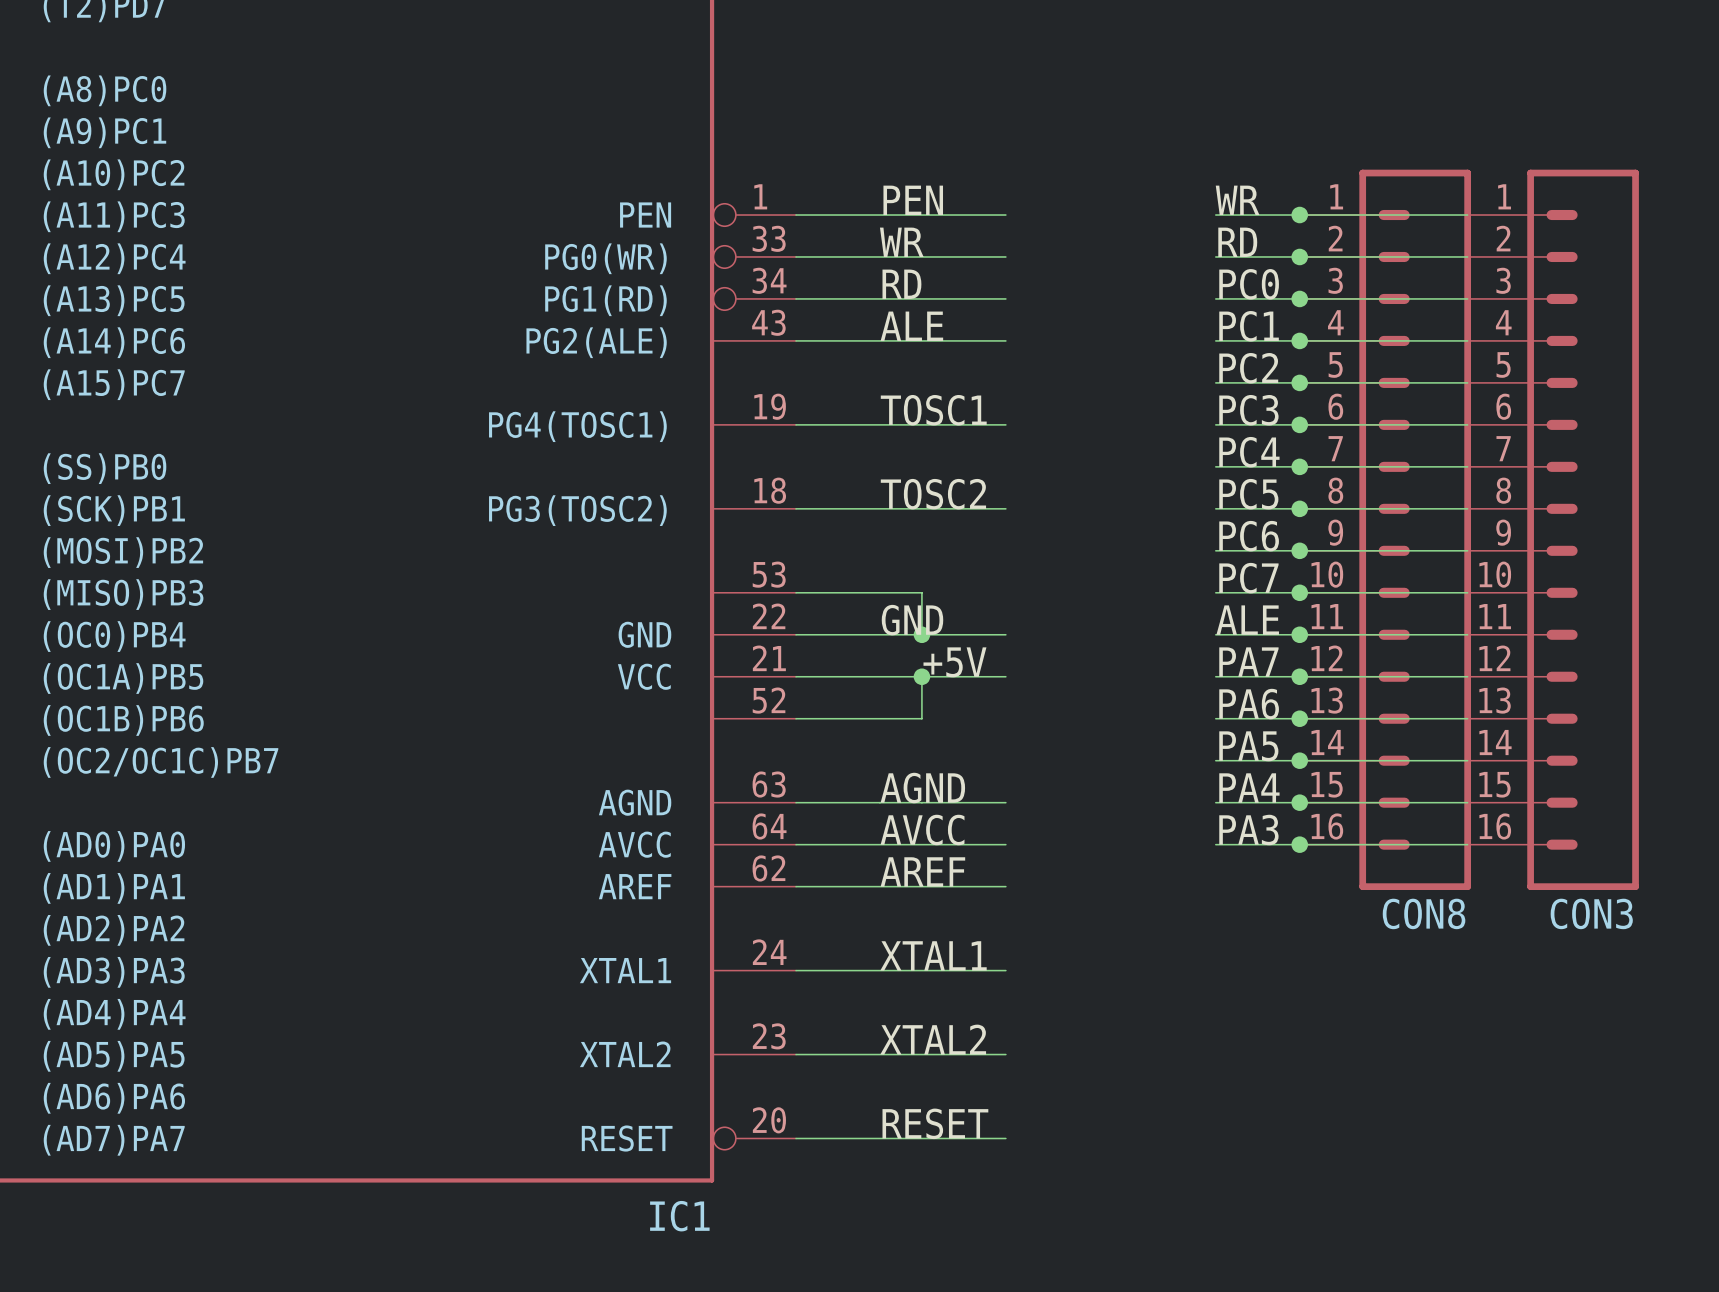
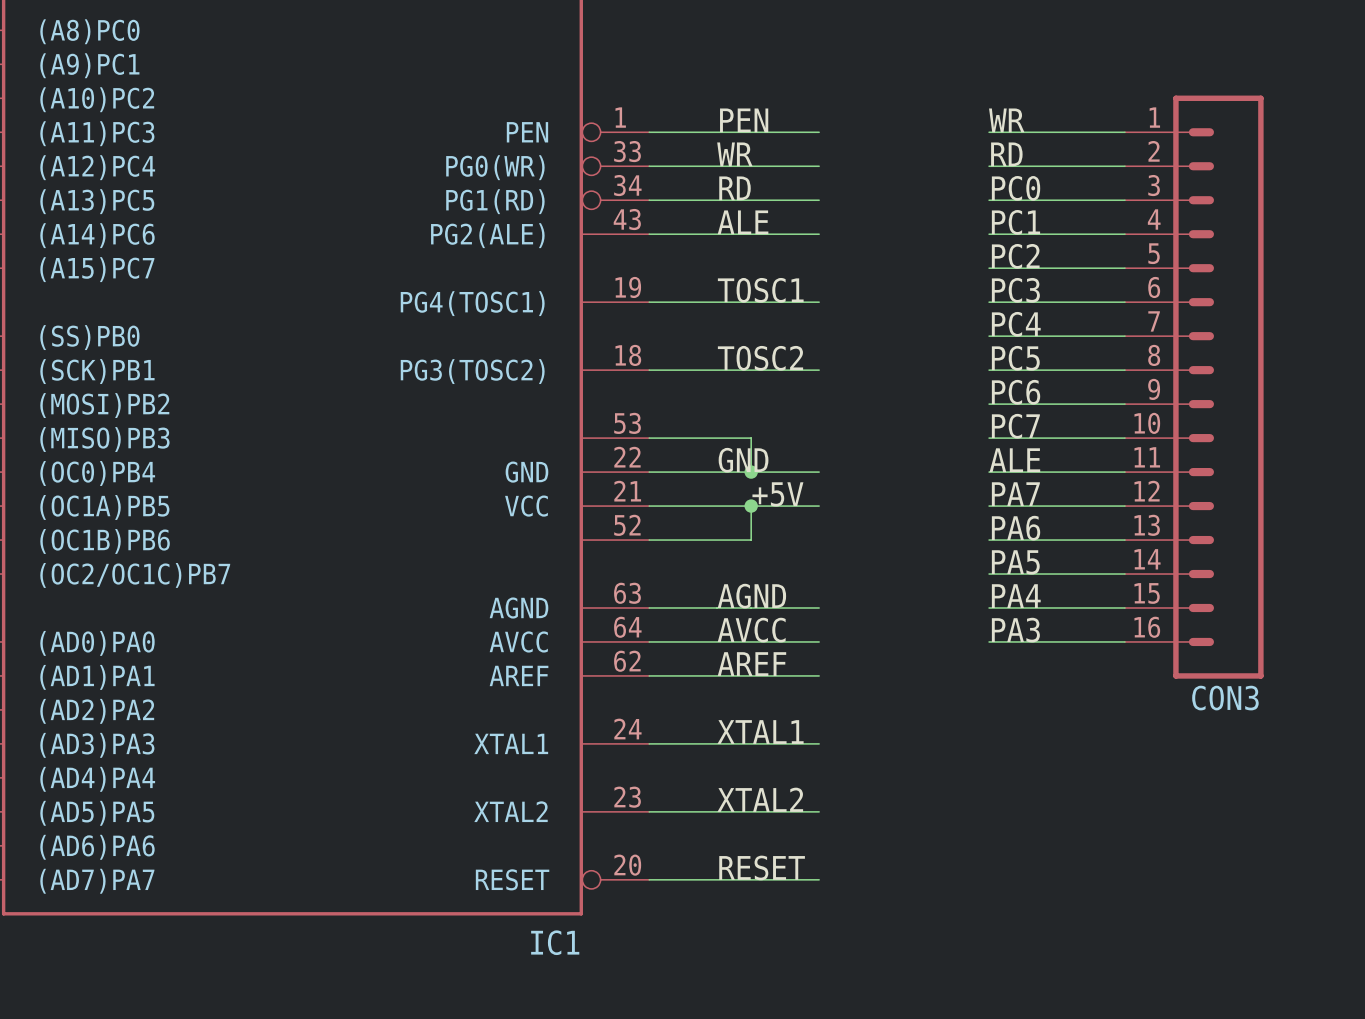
junction: (1299, 215) -> none
junction: (1299, 256) -> none
junction: (1299, 298) -> none
junction: (1299, 340) -> none
junction: (1299, 382) -> none
junction: (1299, 424) -> none
junction: (1299, 466) -> none
junction: (1299, 508) -> none
CON8: (1385, 529) -> none
CON3 position: (1553, 529) -> (1194, 387)
junction: (1299, 550) -> none
junction: (1299, 592) -> none
junction: (1299, 634) -> none
junction: (1299, 676) -> none
junction: (1299, 718) -> none
junction: (1299, 760) -> none
junction: (1299, 802) -> none
junction: (1299, 844) -> none

